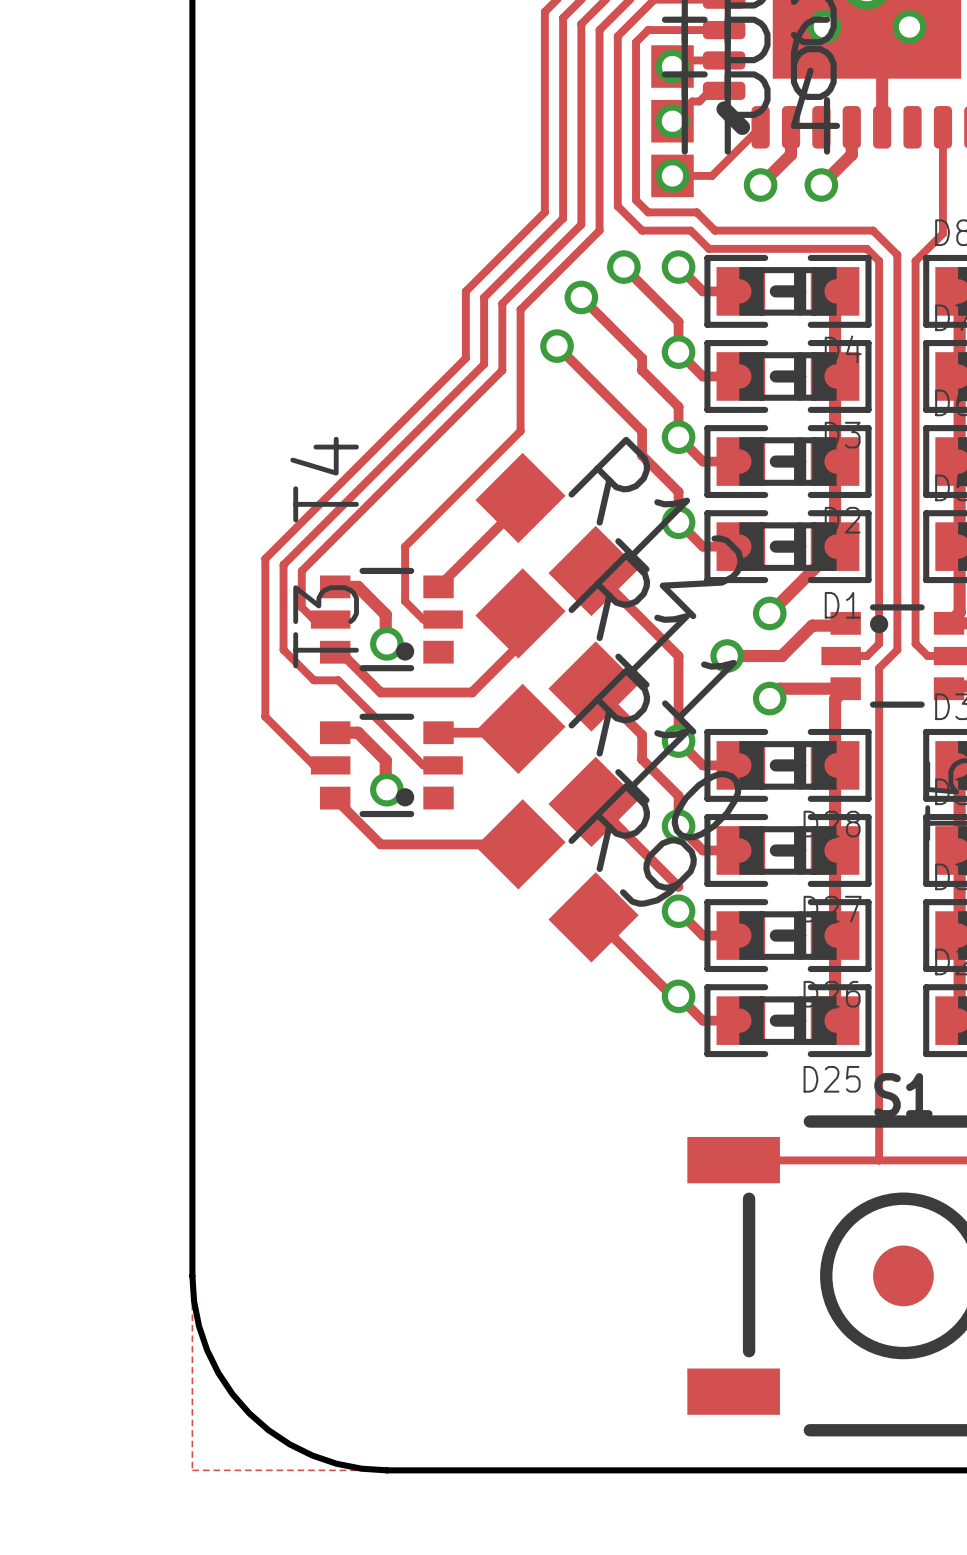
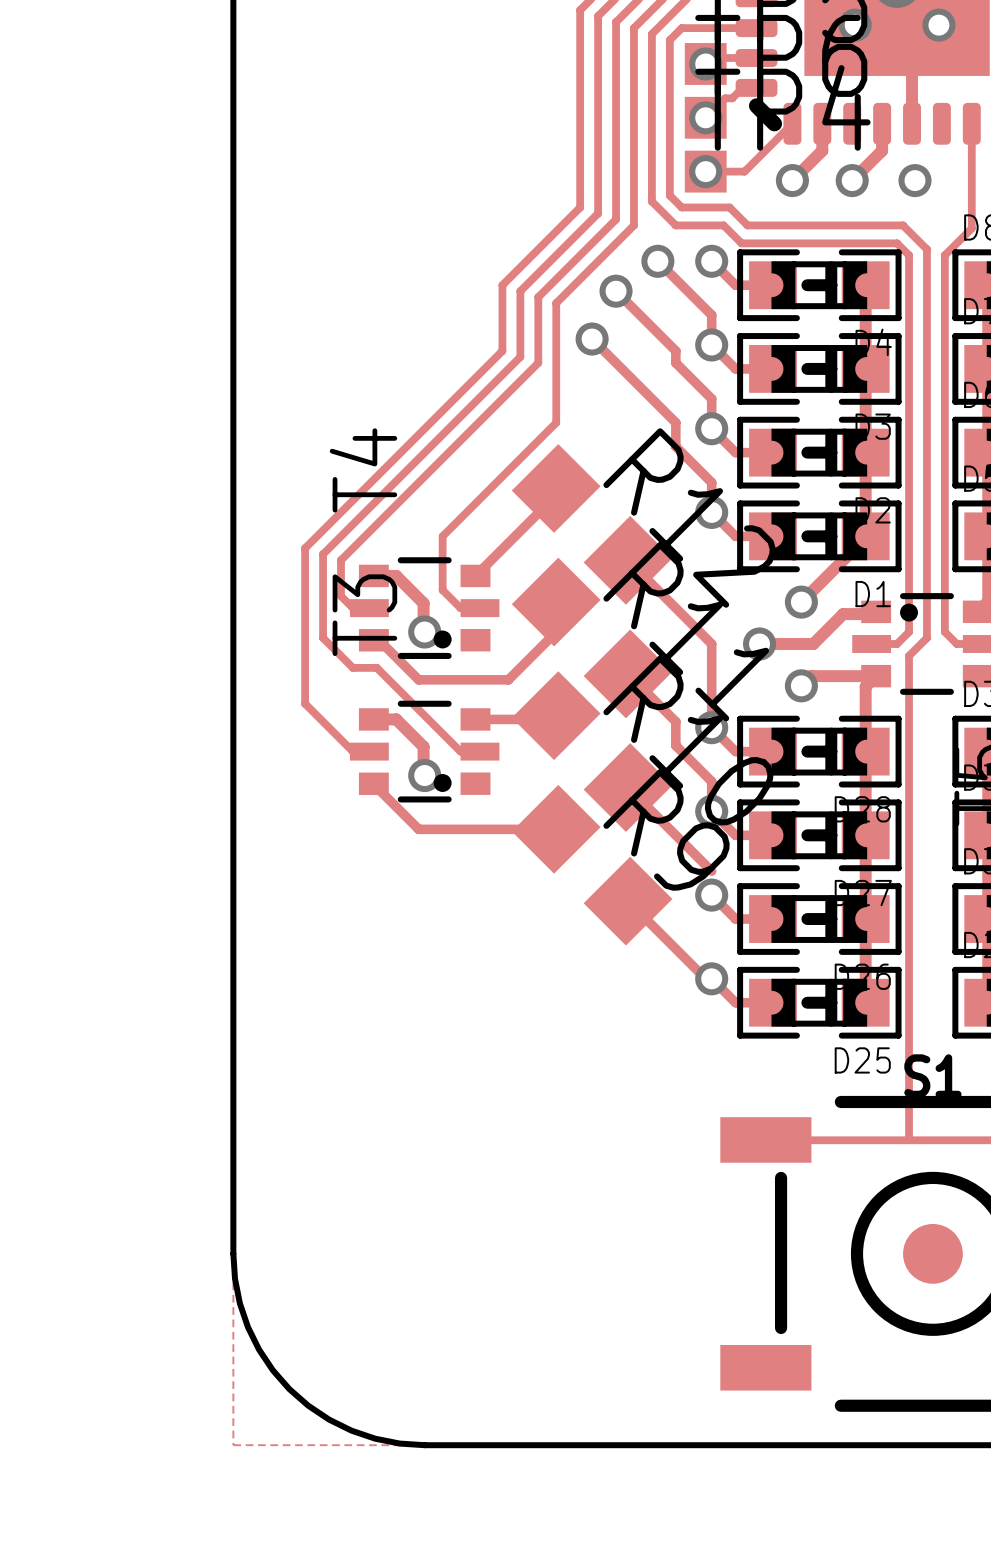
via: none -> (915, 180)

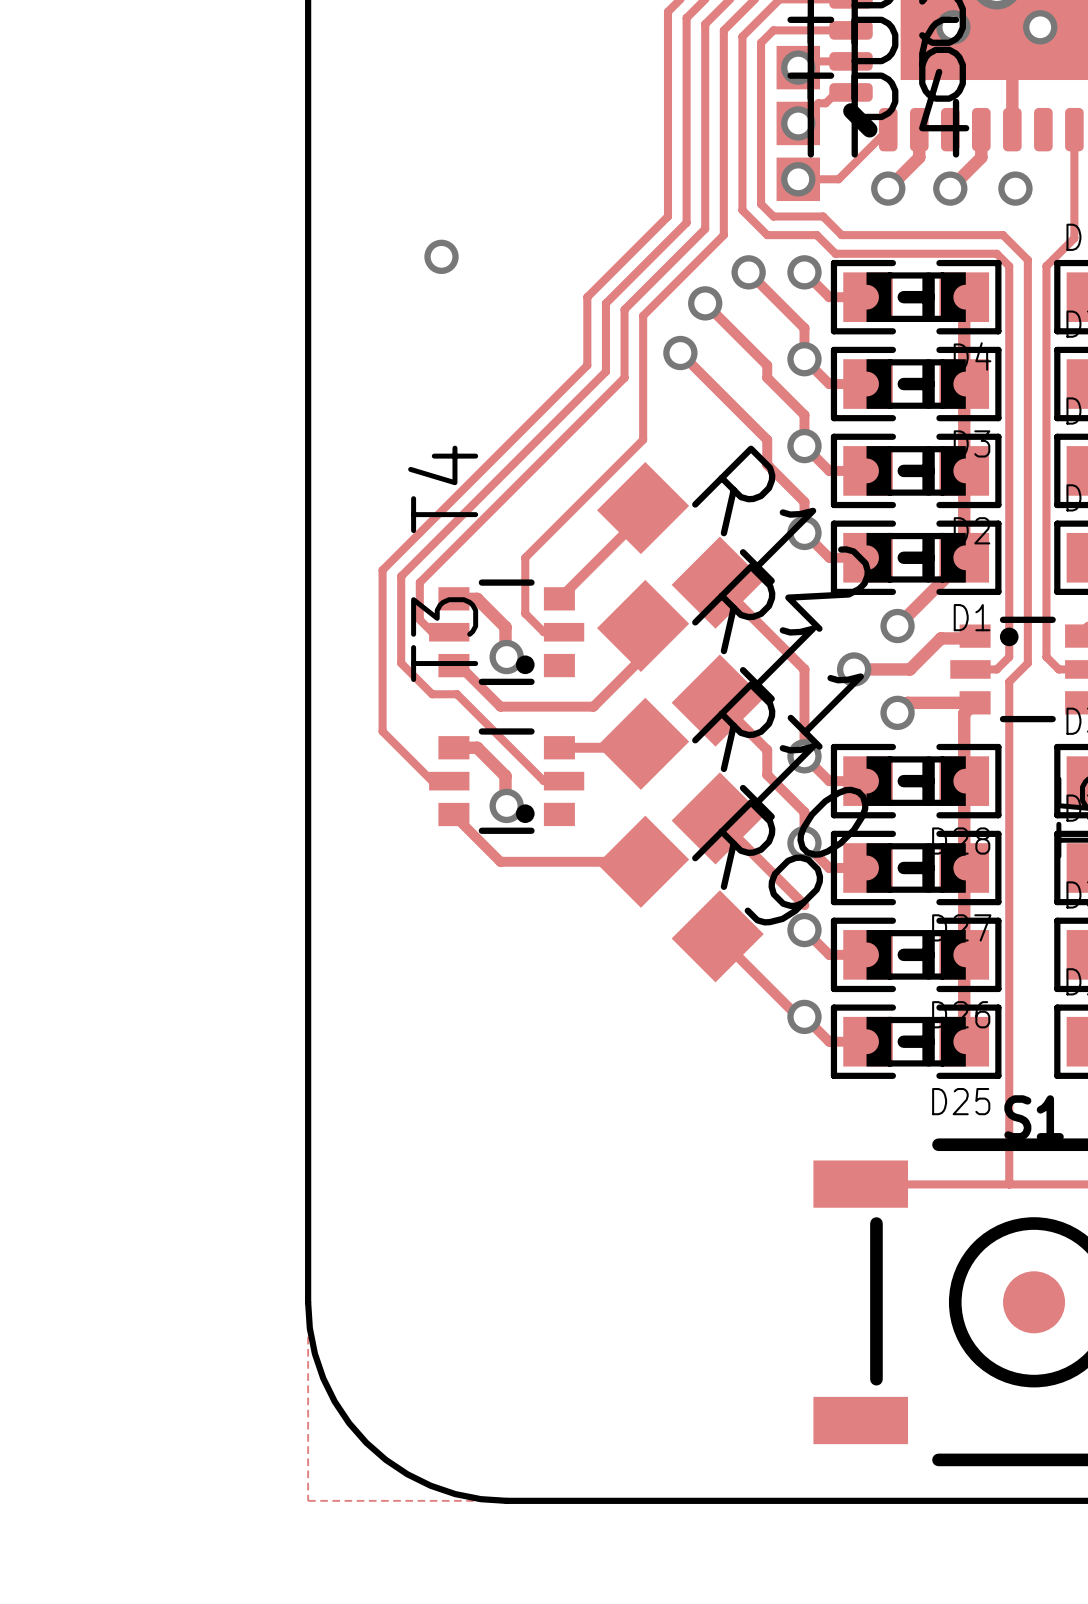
via: none -> (441, 256)

